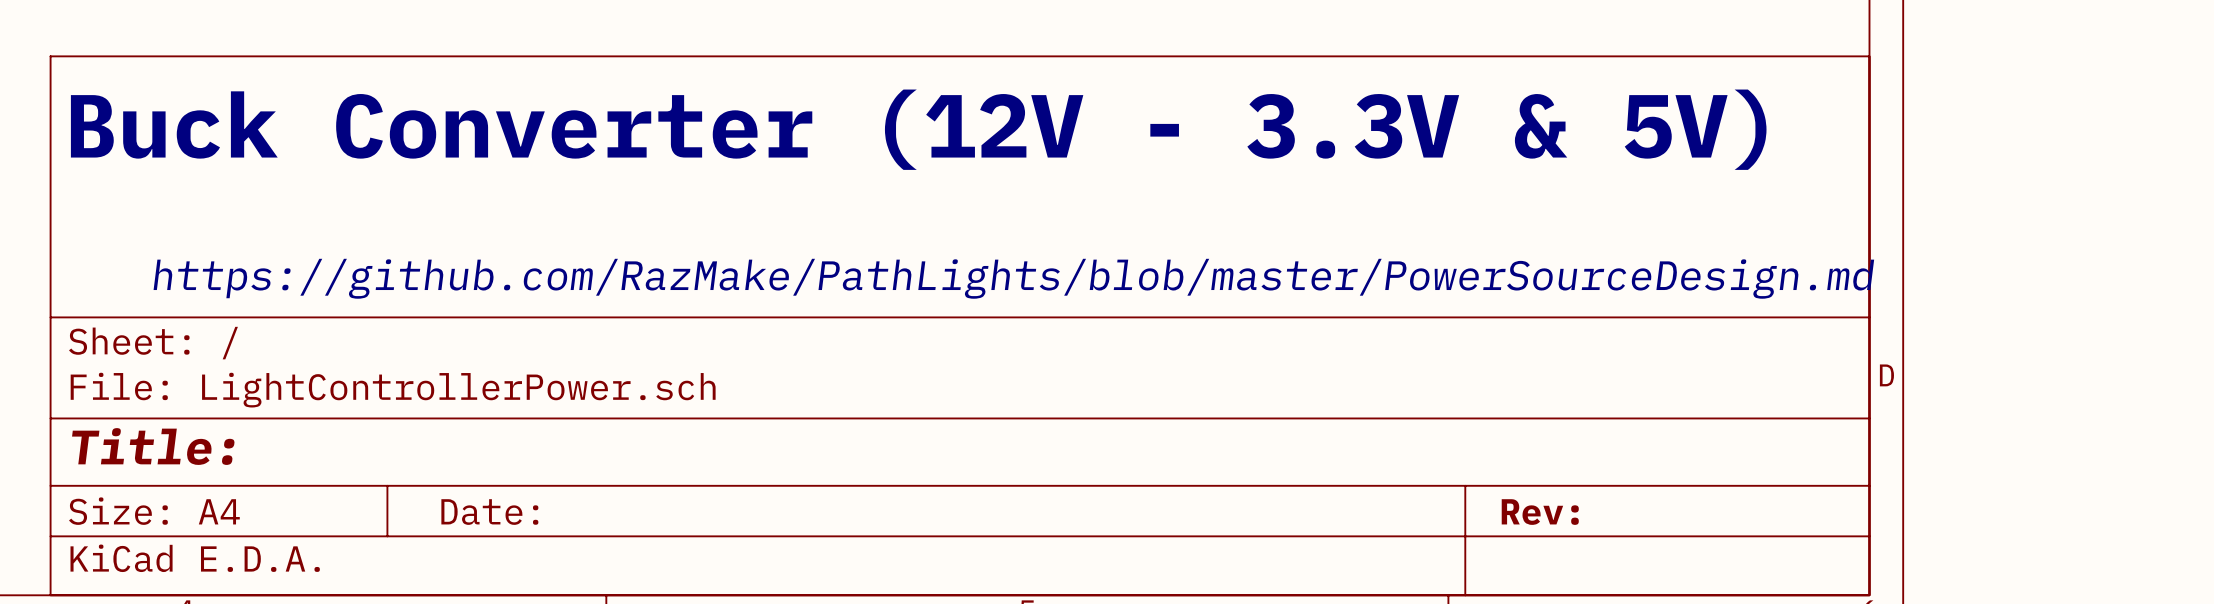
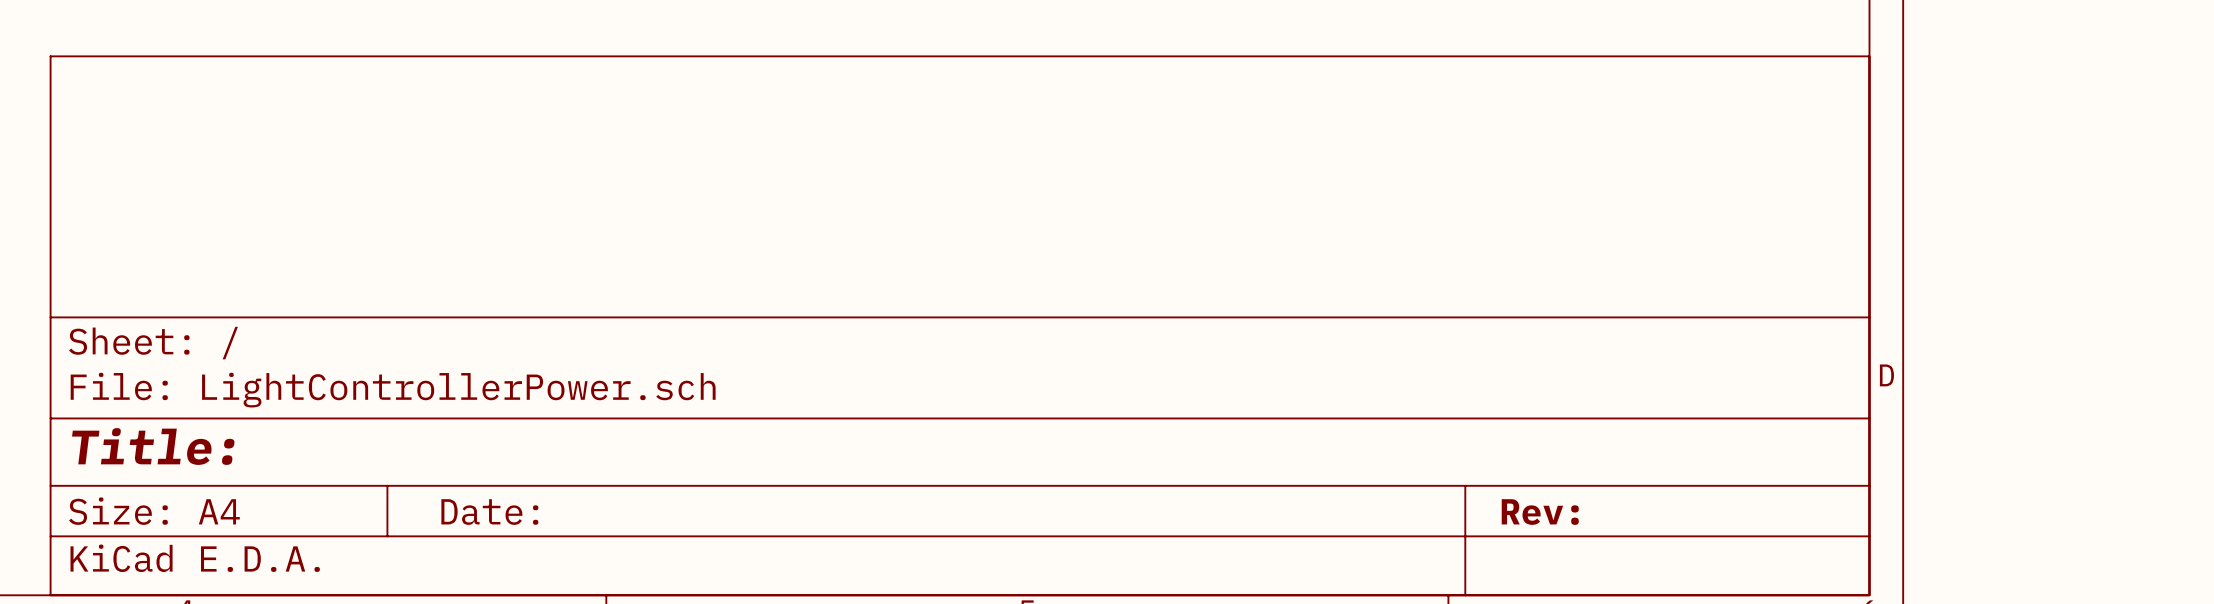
text: Buck Converter (12V - 3.3V & 5V) (918, 129) -> none
text: https://github.com/RazMake/PathLights/blob/master/PowerSourceDesign.md (1013, 278) -> none

